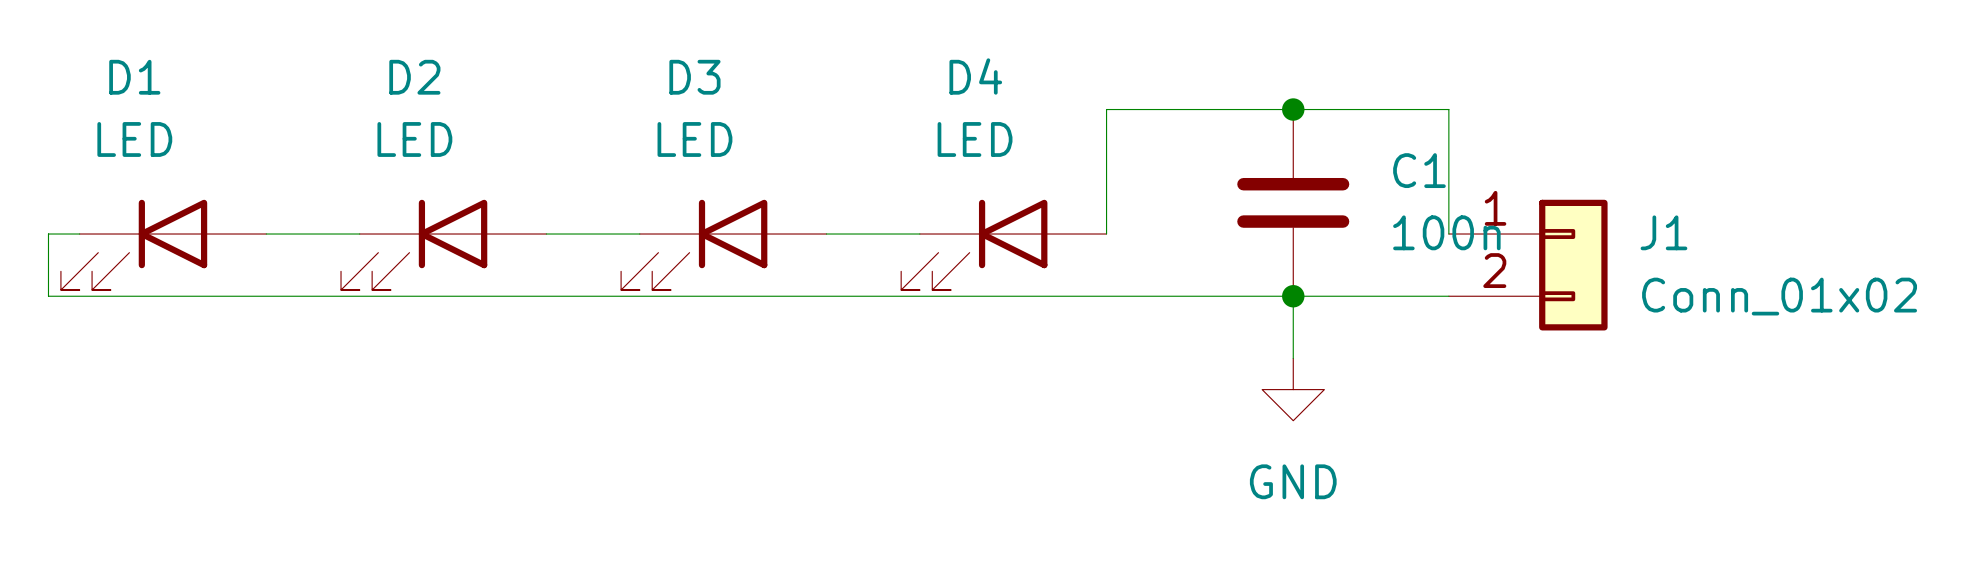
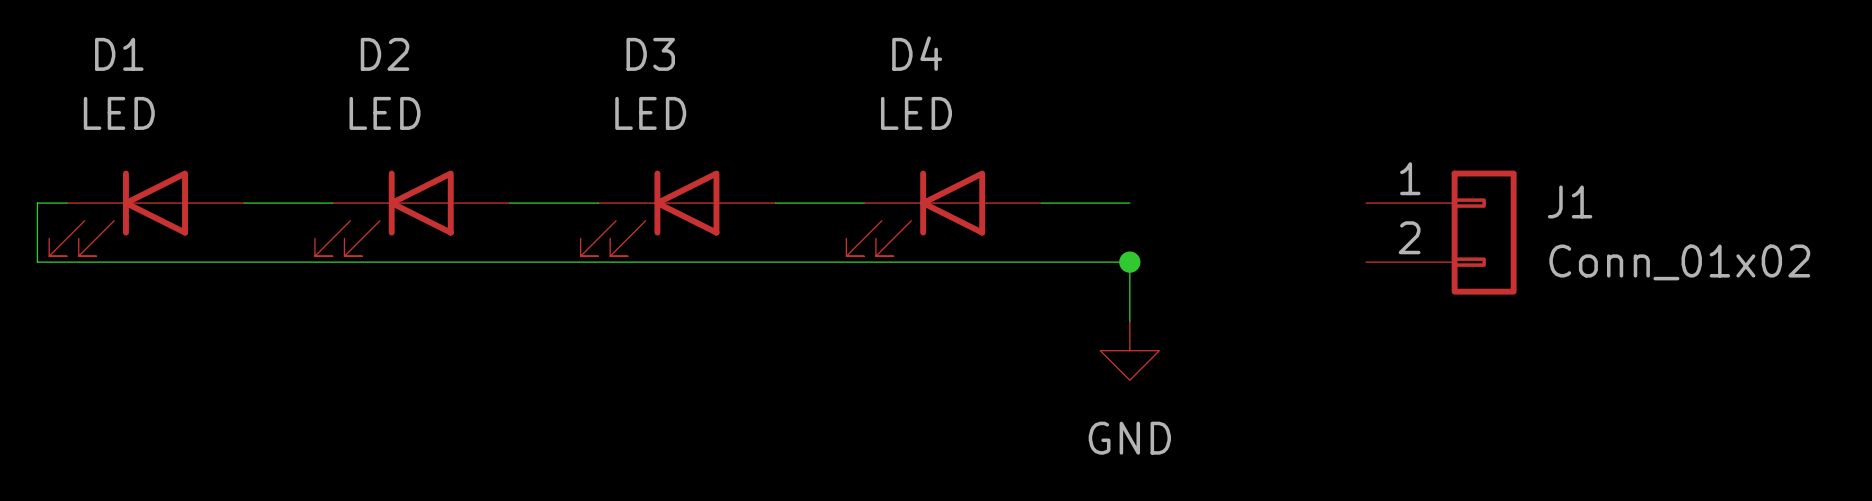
junction: (1293, 109) -> none
C1: 100n (1293, 202) -> none
wire: (1106, 234) (1106, 109) (1448, 109) (1448, 234) -> (1041, 203) (1129, 203)
wire: (1199, 296) (1448, 296) -> (1129, 262) (1129, 321)
wire: (1293, 296) (1293, 358) -> none
junction position: (1293, 296) -> (1129, 262)
power symbol position: GND (1293, 389) -> GND (1129, 350)

